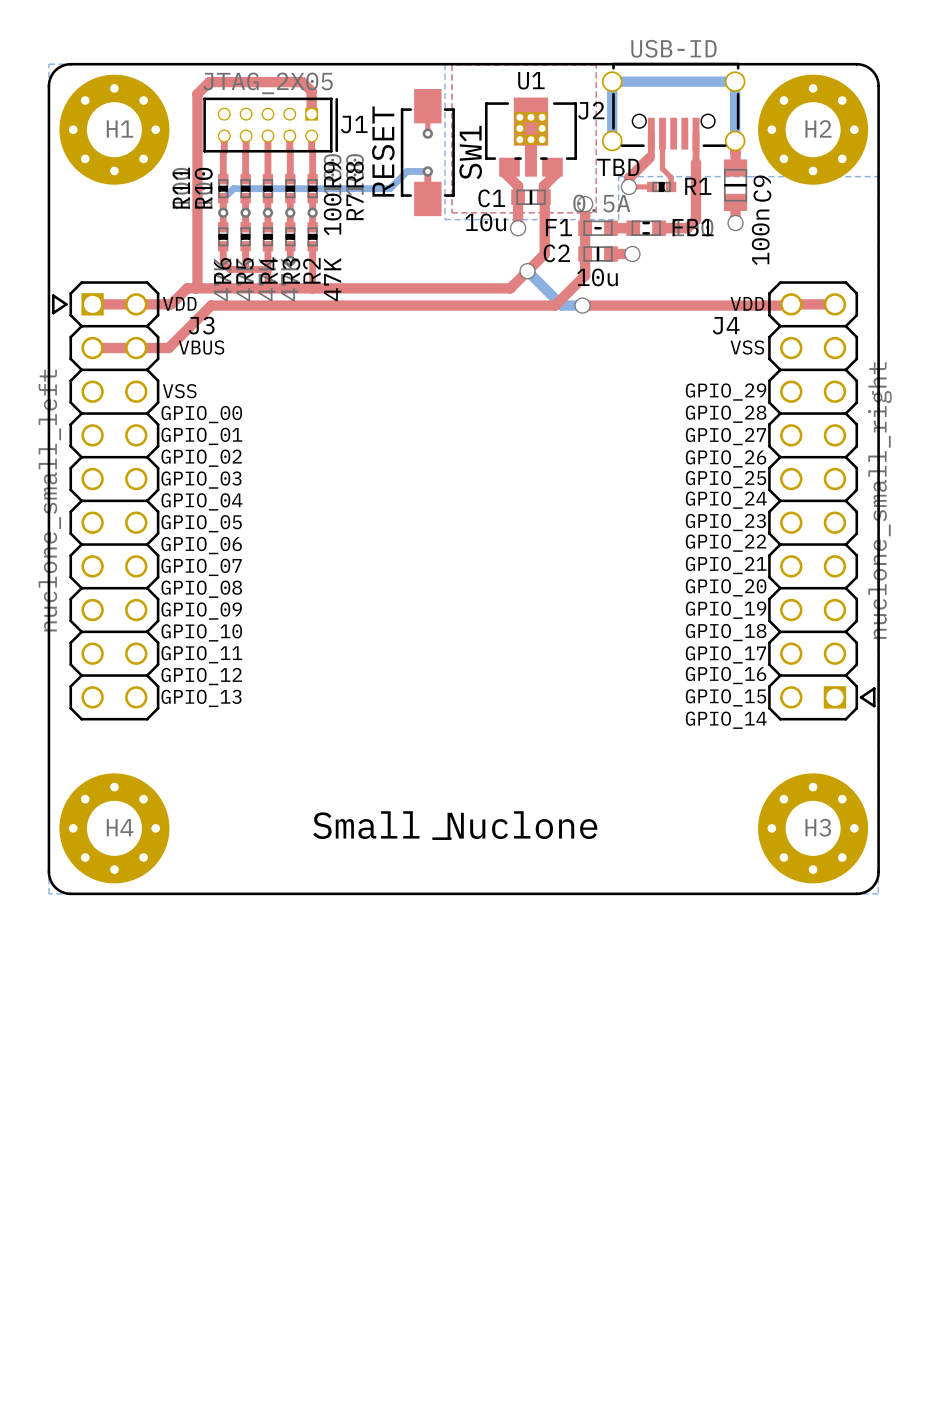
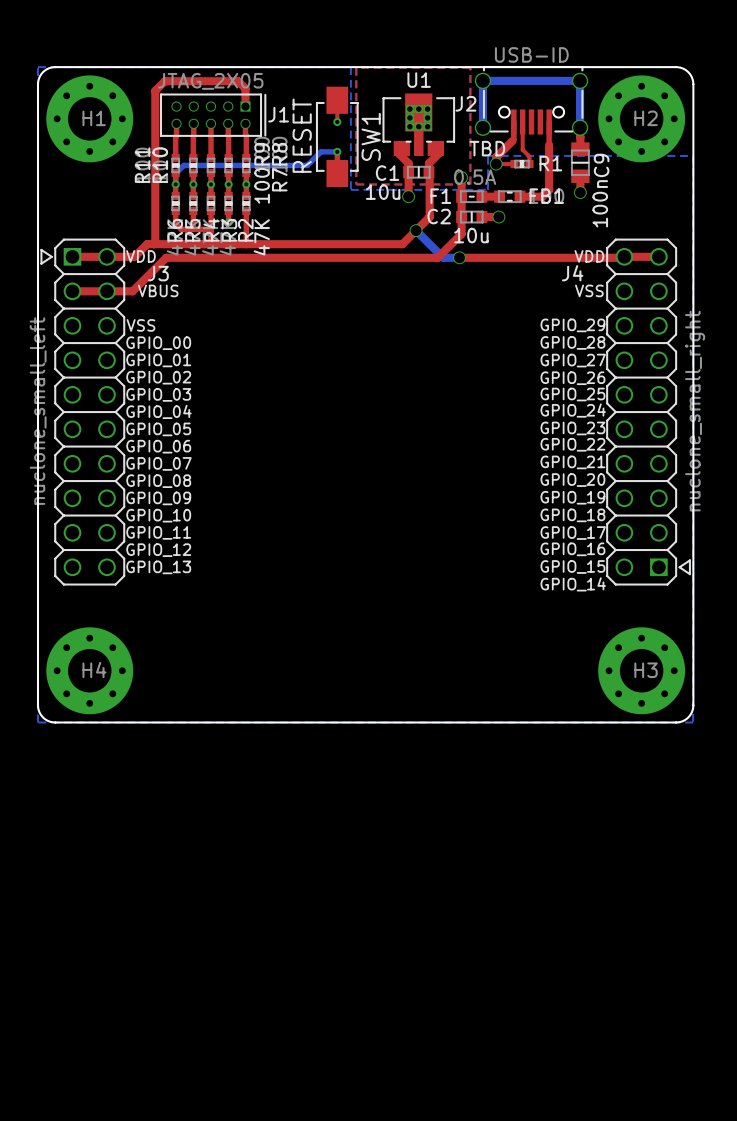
drawing: [432, 837, 452, 840] -> none

